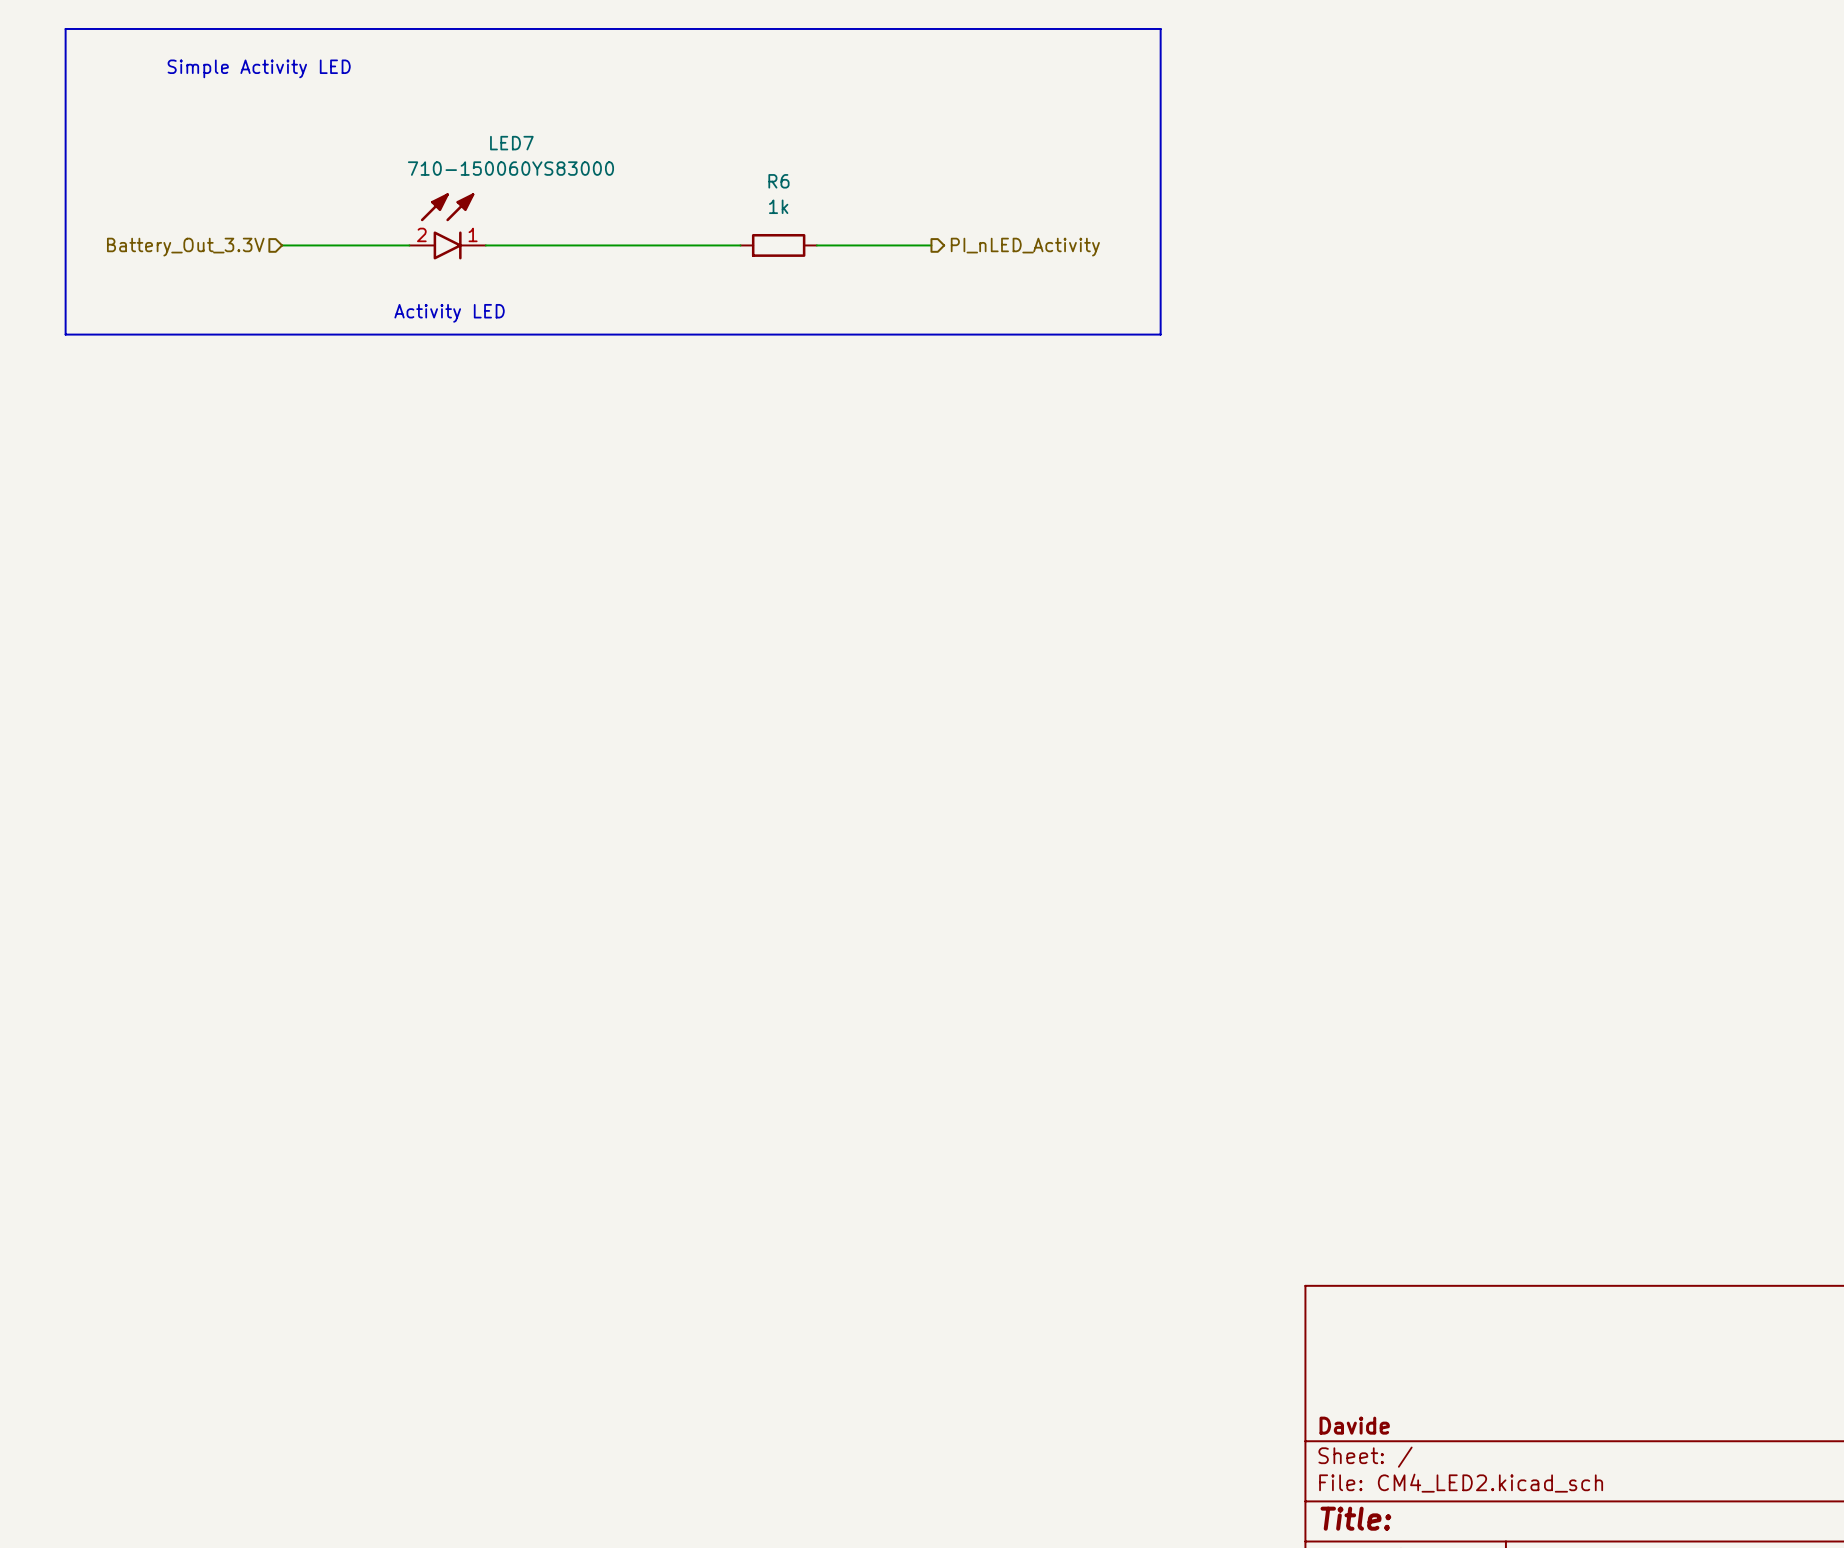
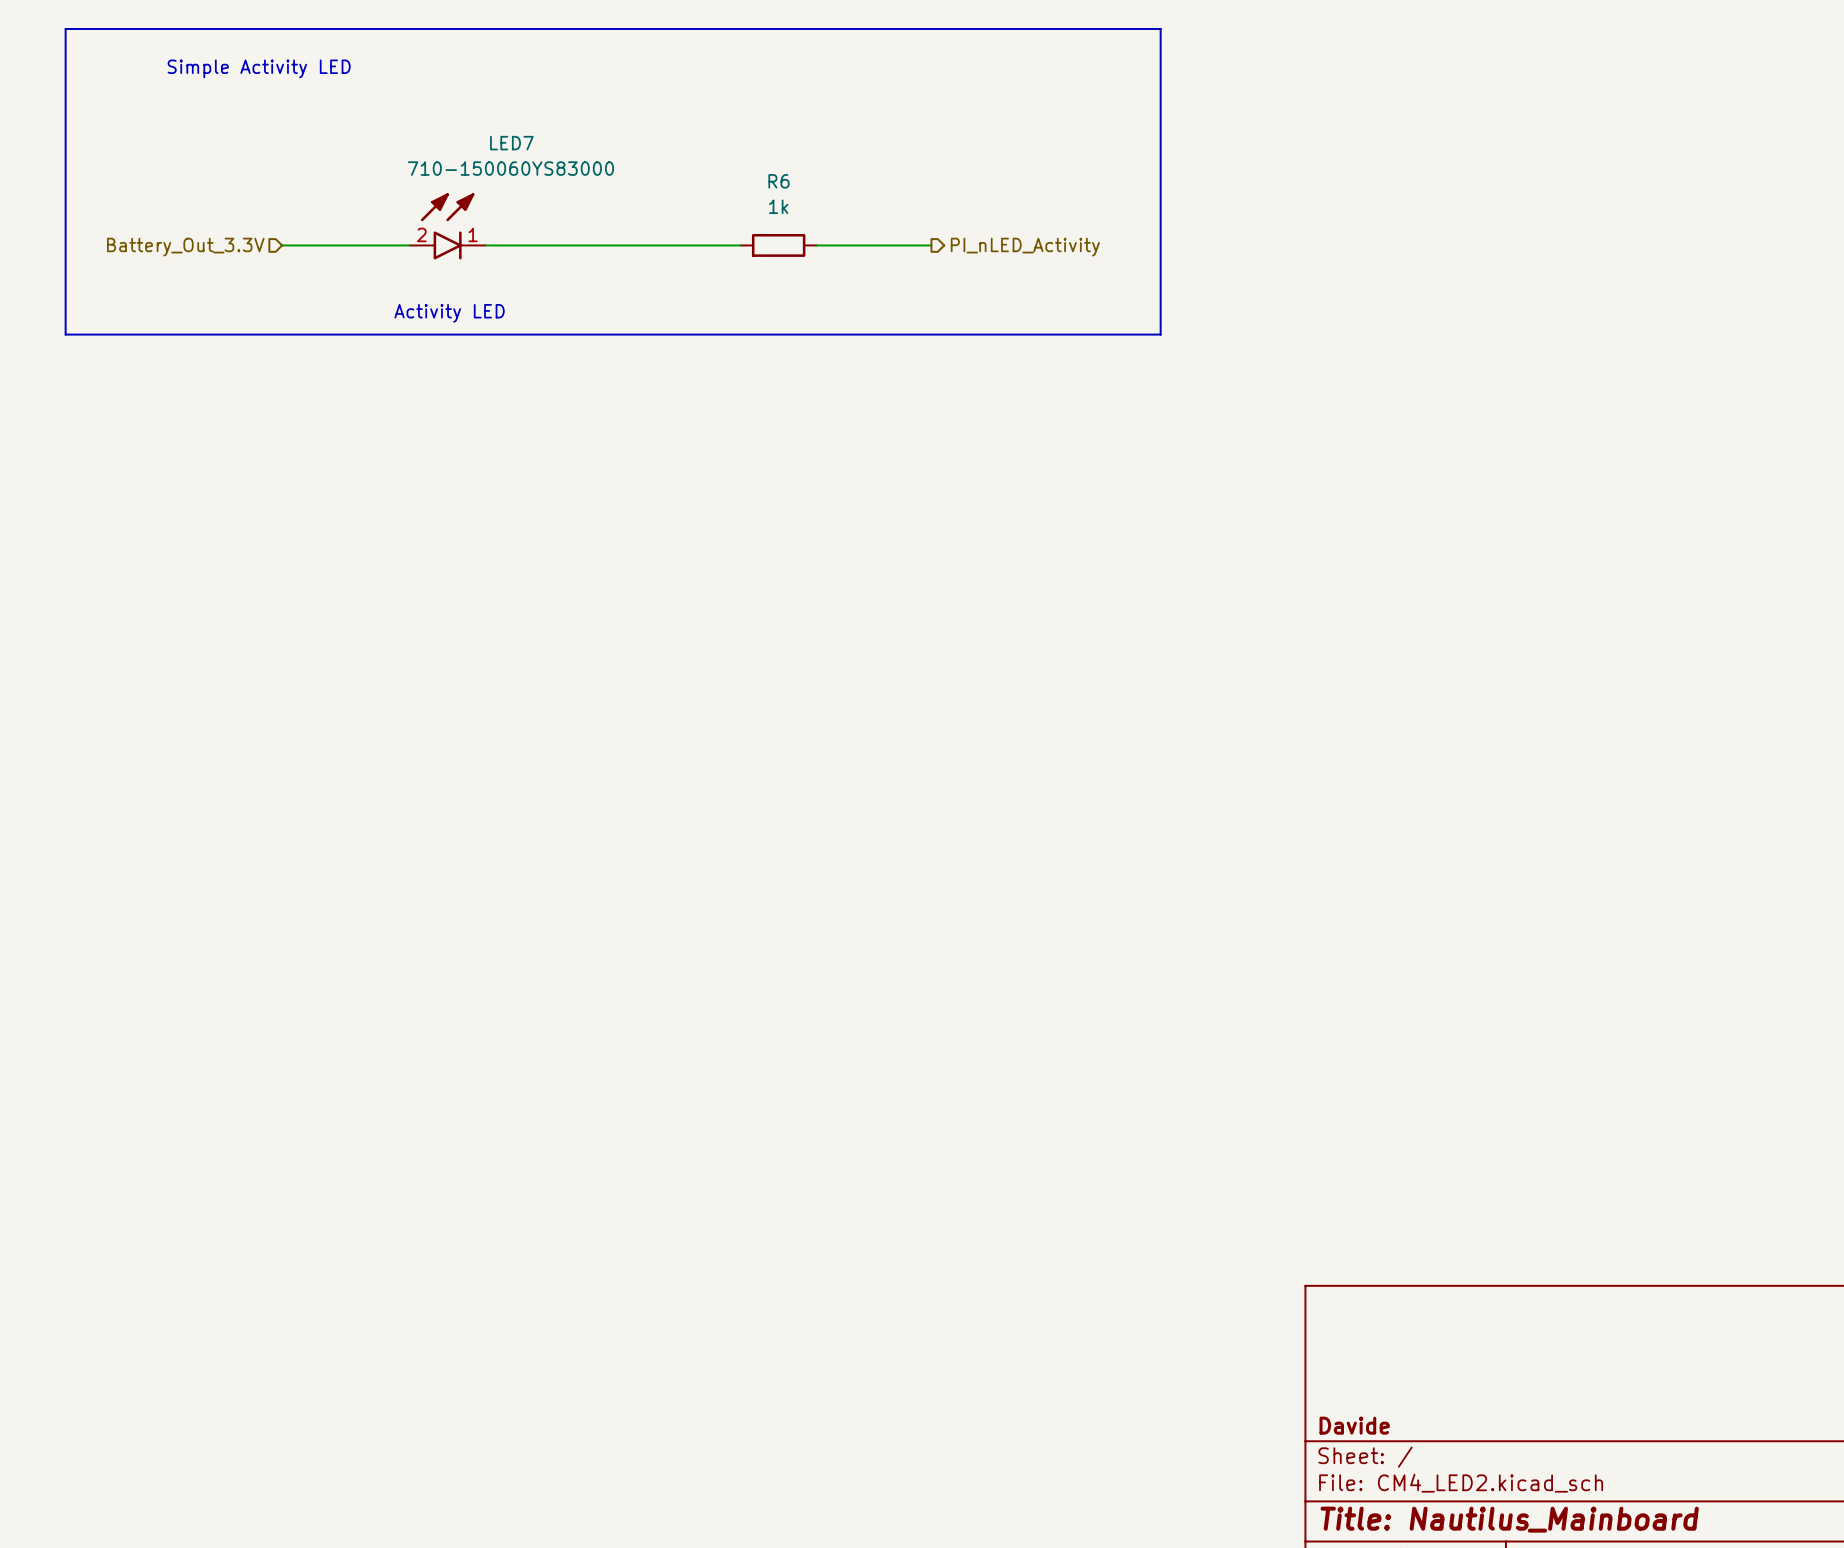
title block: Title: (1355, 1518) -> Title: Nautilus_Mainboard (1509, 1519)

